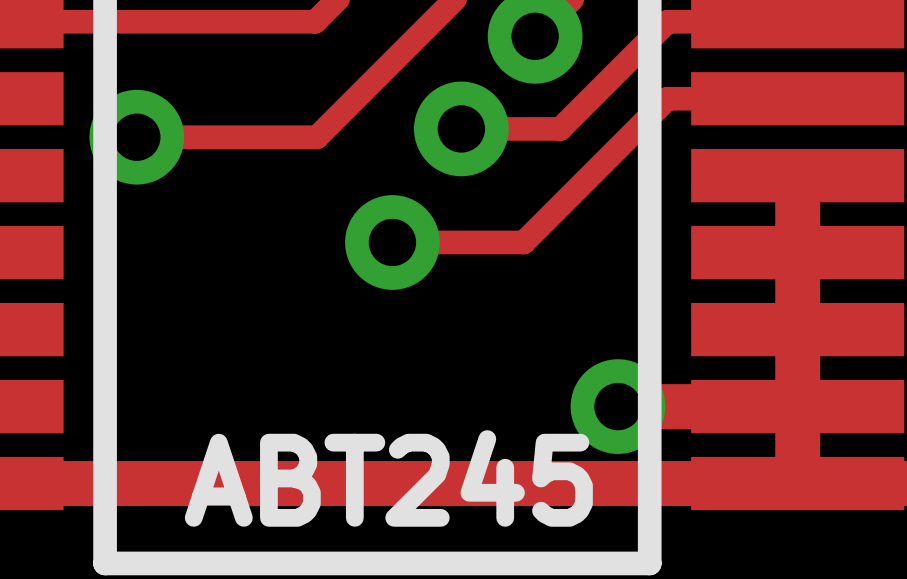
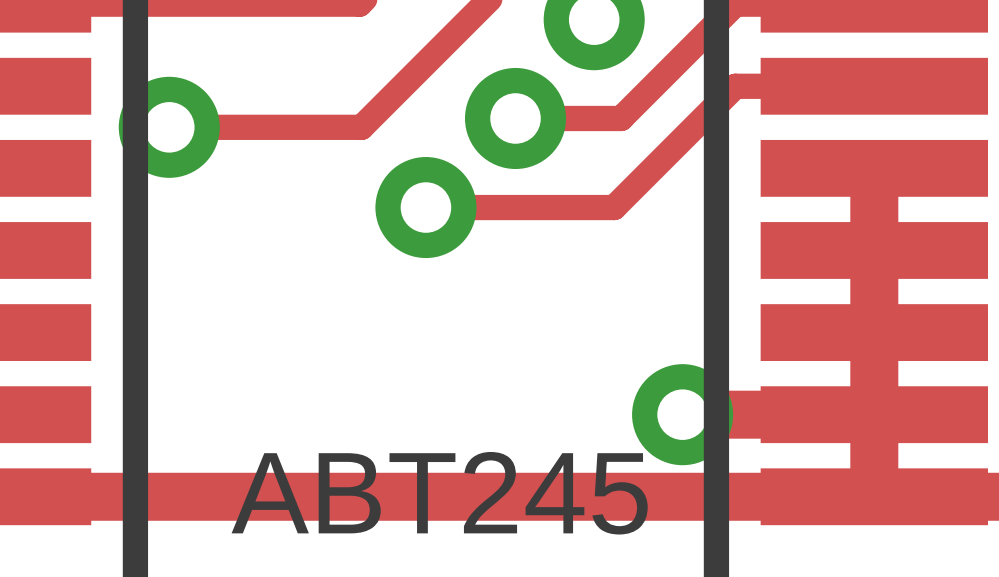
track: (553, 212) (523, 242) (392, 242) -> (614, 207) (425, 207)
via position: (392, 242) -> (425, 207)

